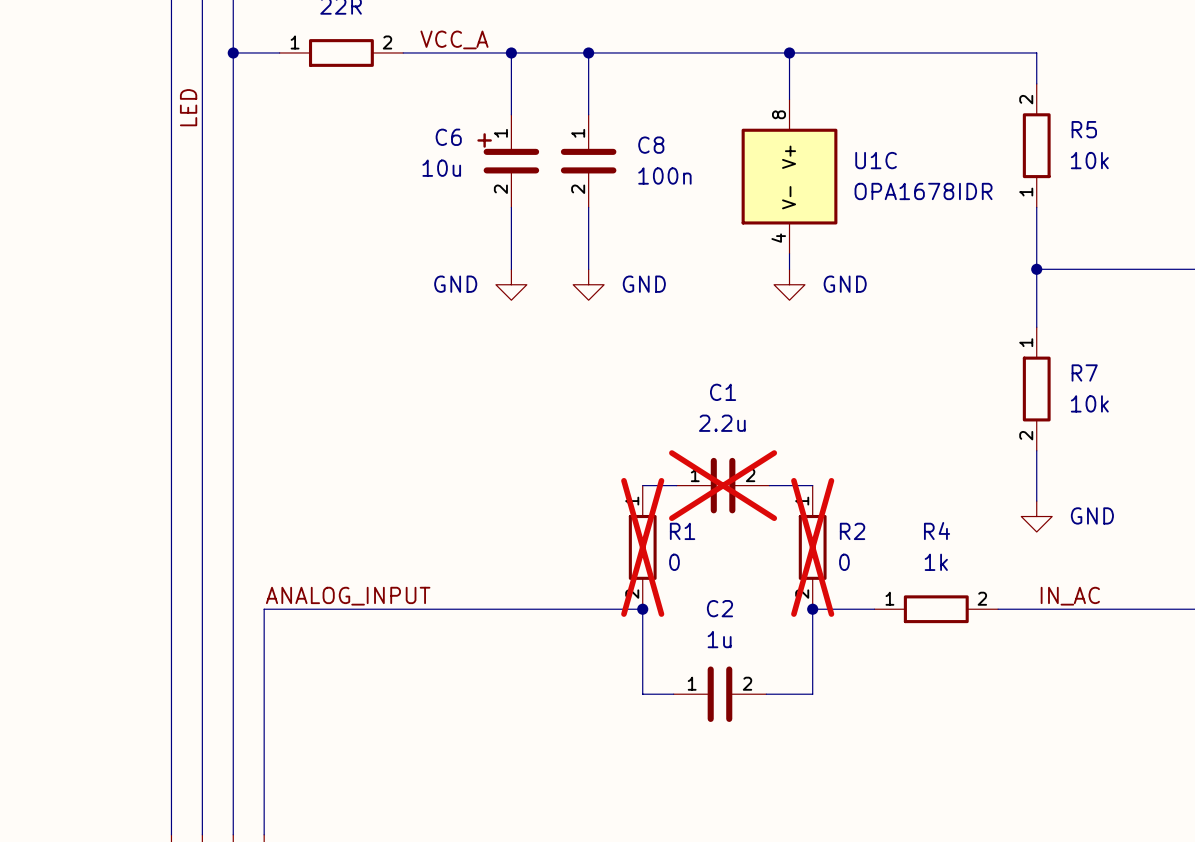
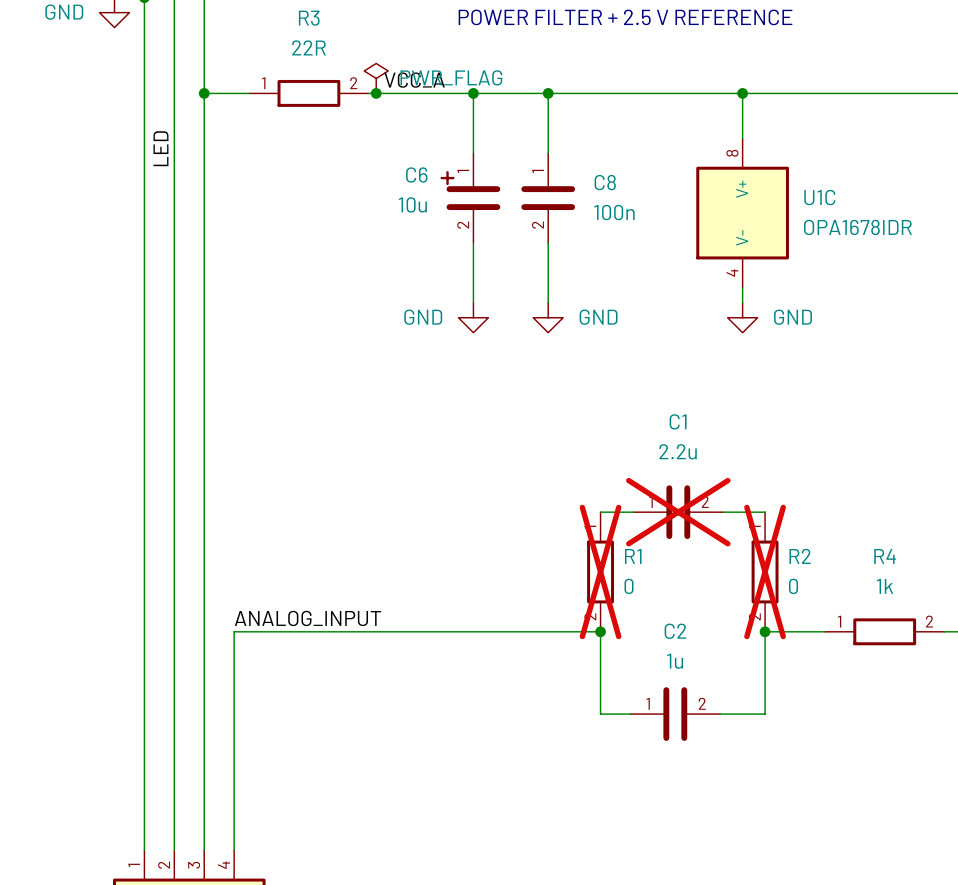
power symbol: none -> PWR_FLAG (376, 78)
junction: none -> (376, 93)

